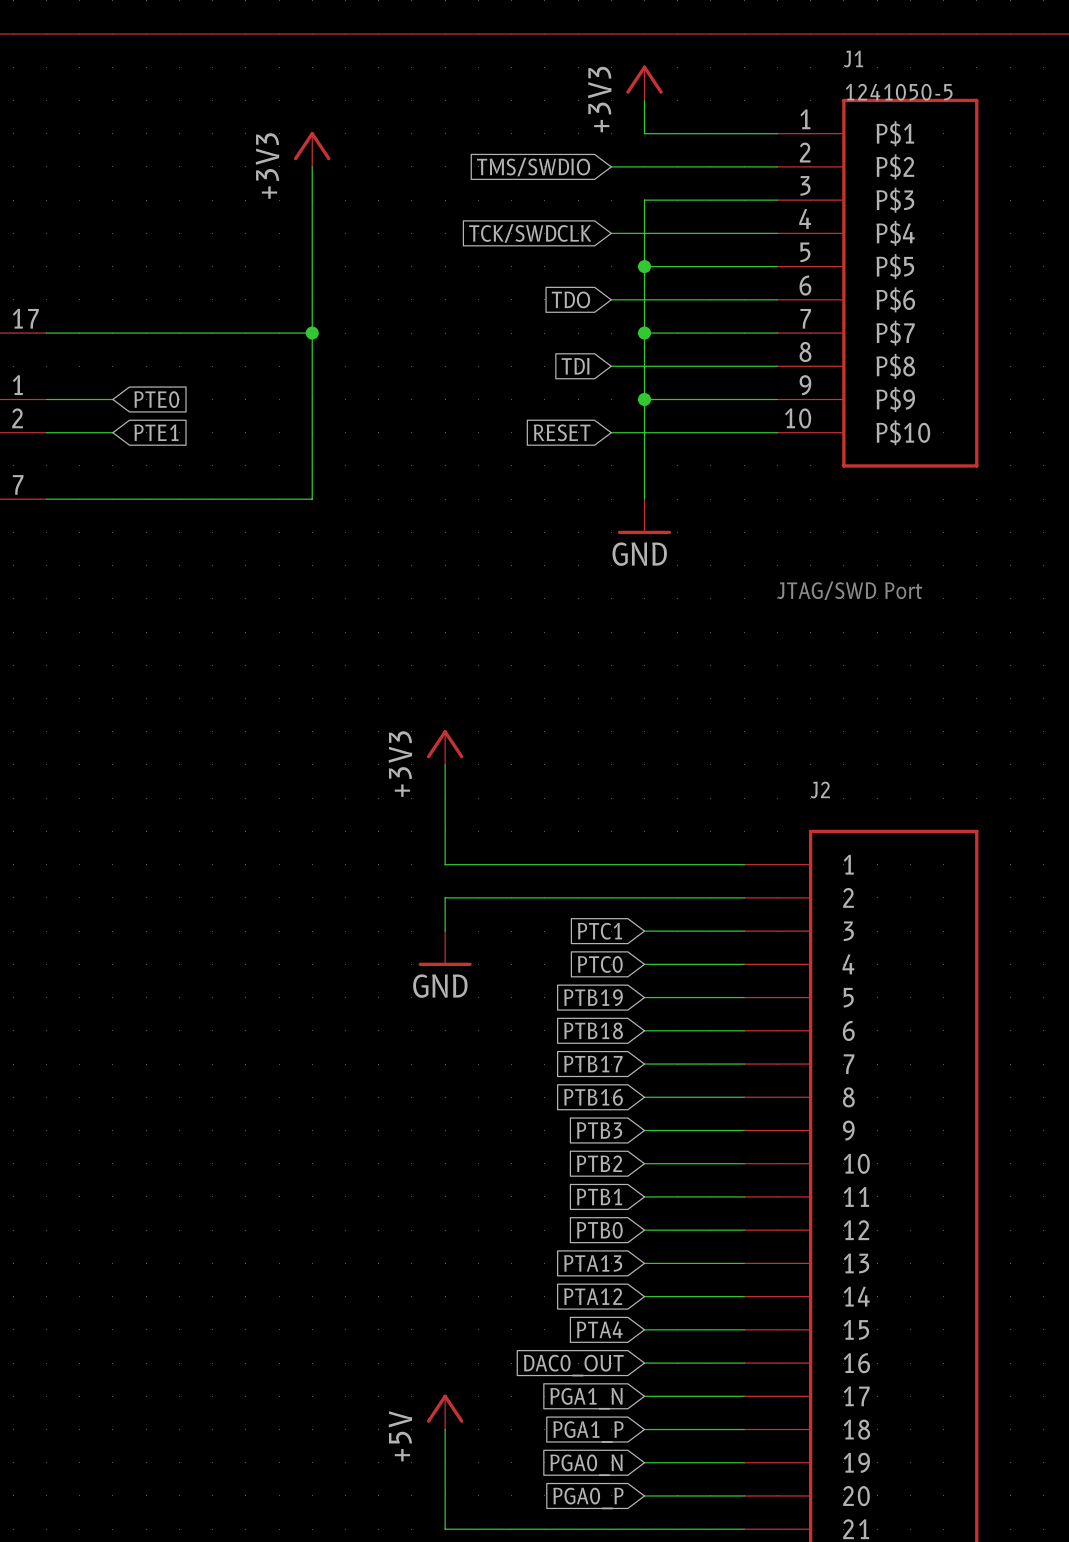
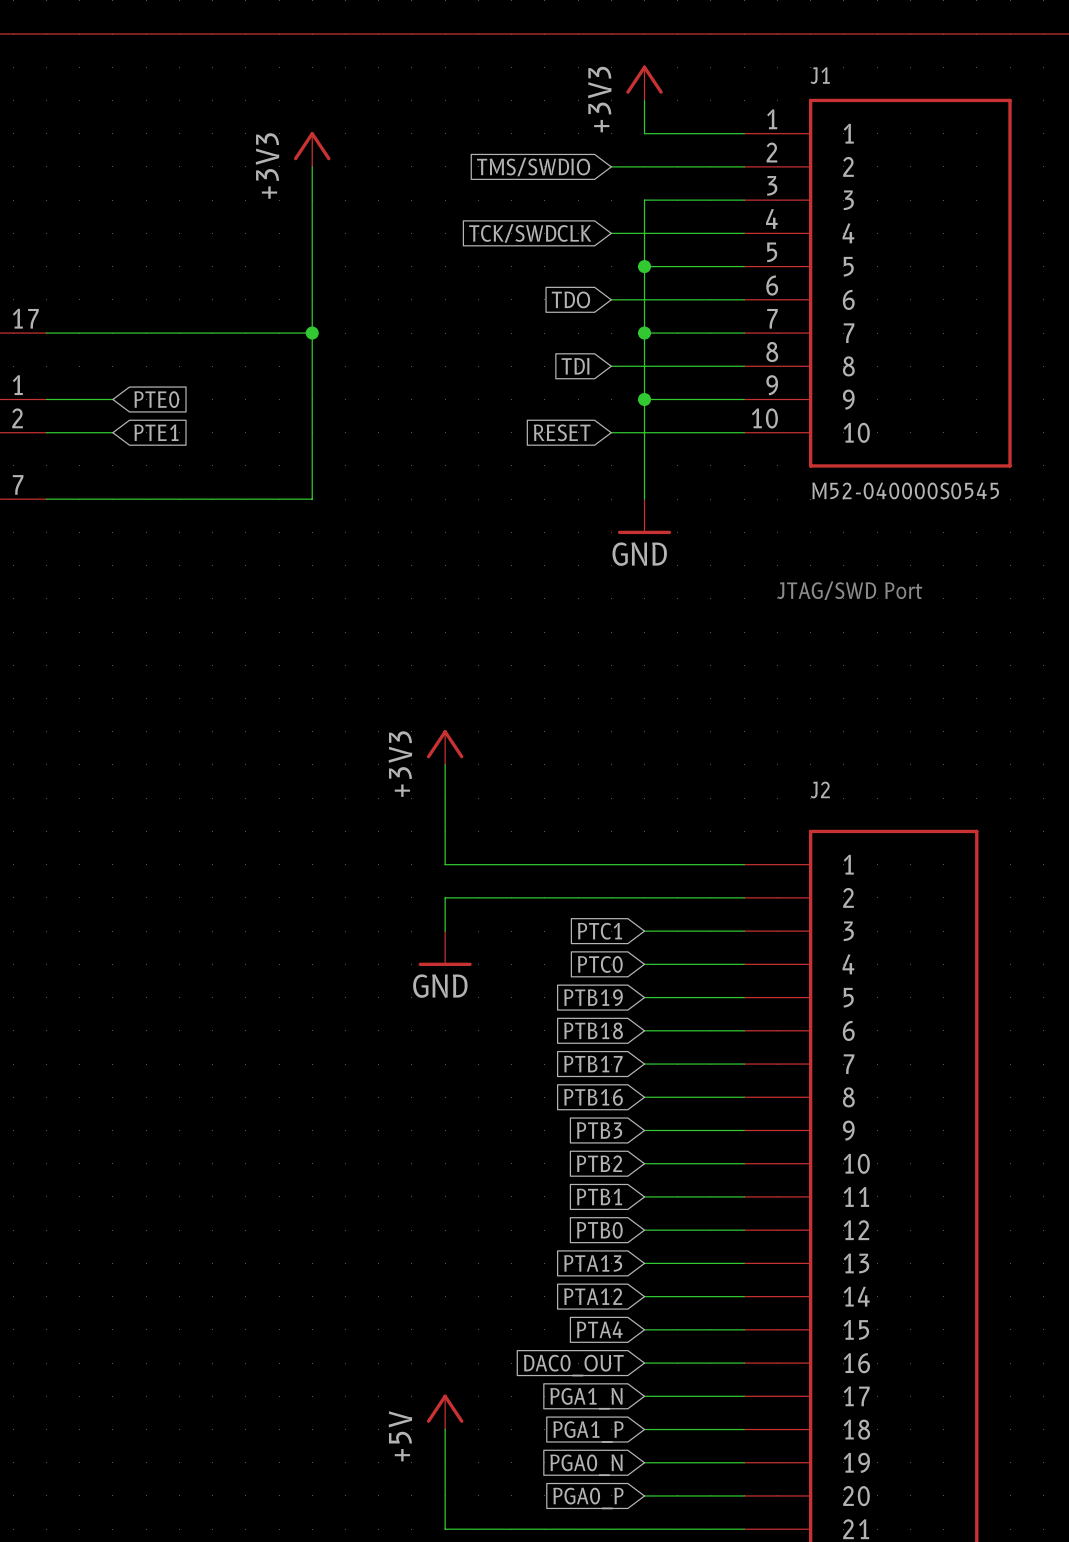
J1 name position: J1 (853, 59) -> J1 (820, 75)
J1 value: 1241050-5 (899, 92) -> M52-040000S0545 (905, 490)
J1 symbol: [777, 98, 979, 468] -> [744, 98, 1012, 468]

